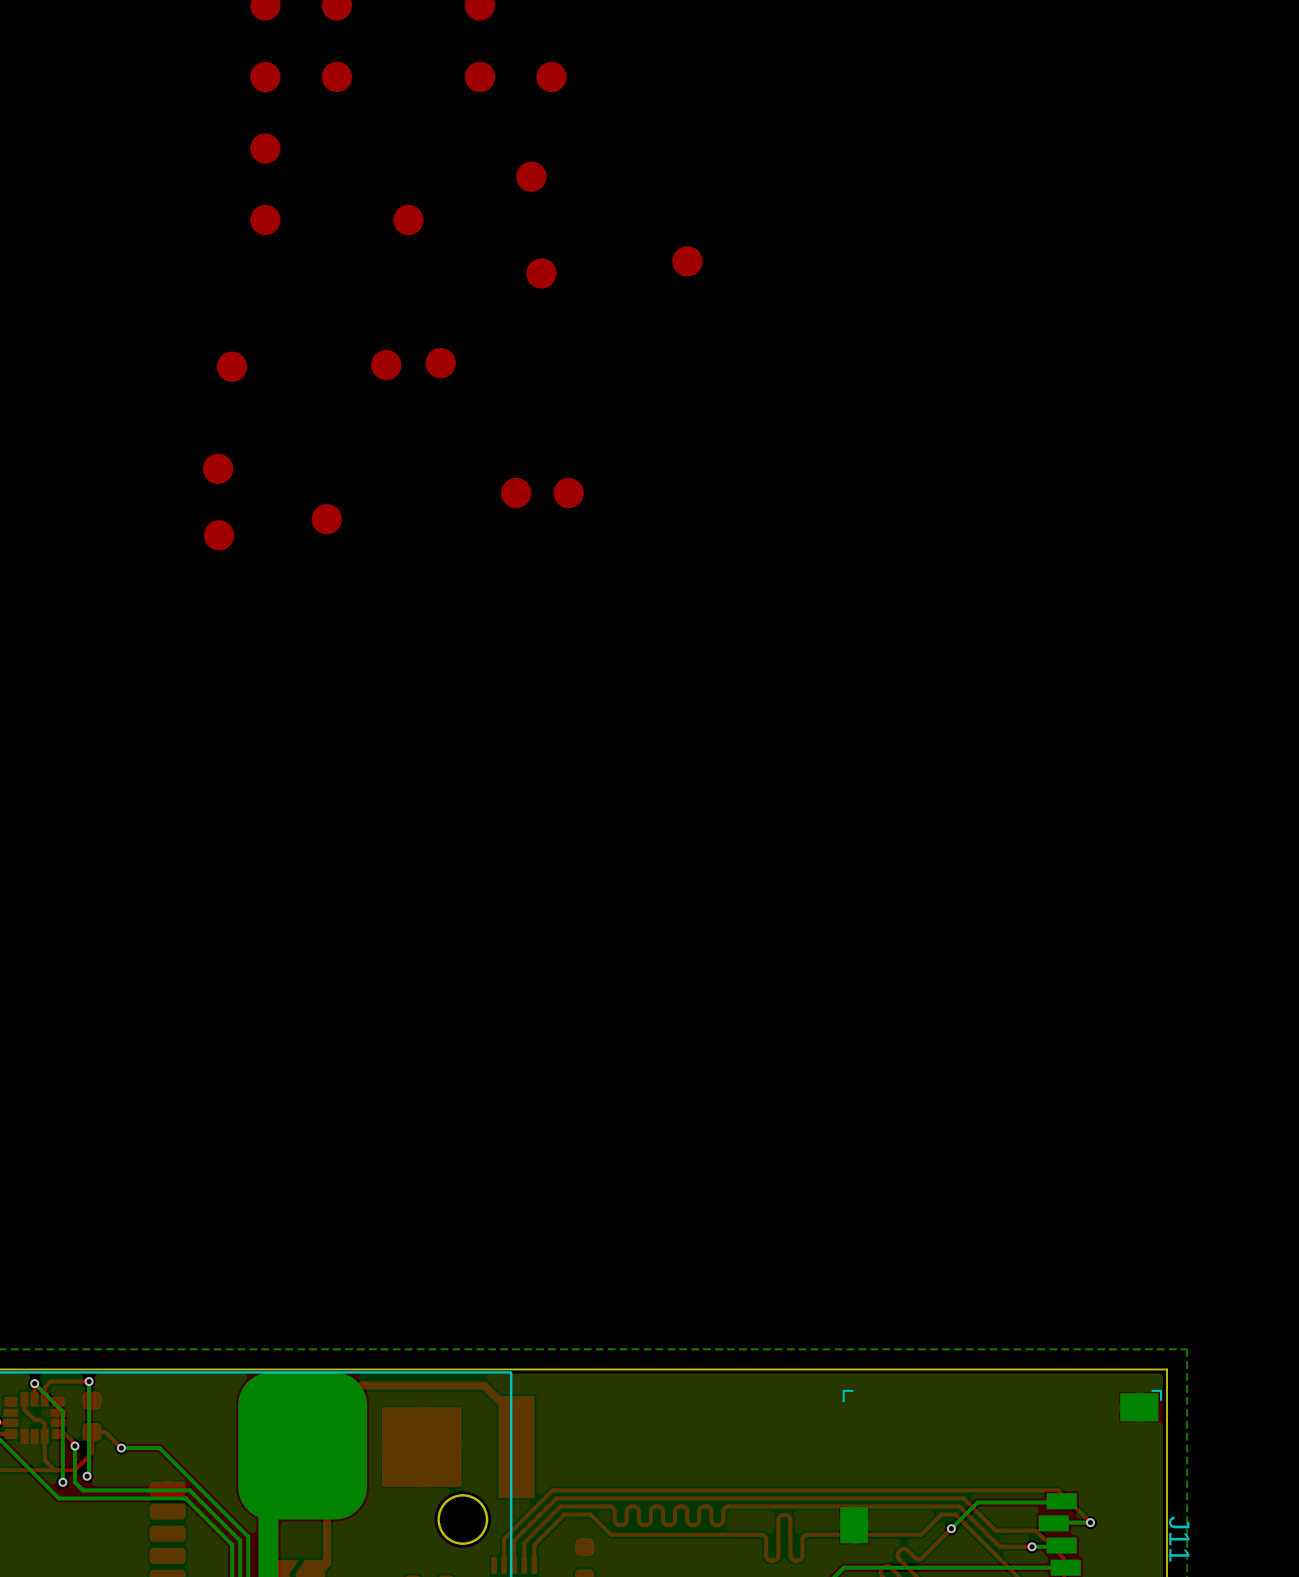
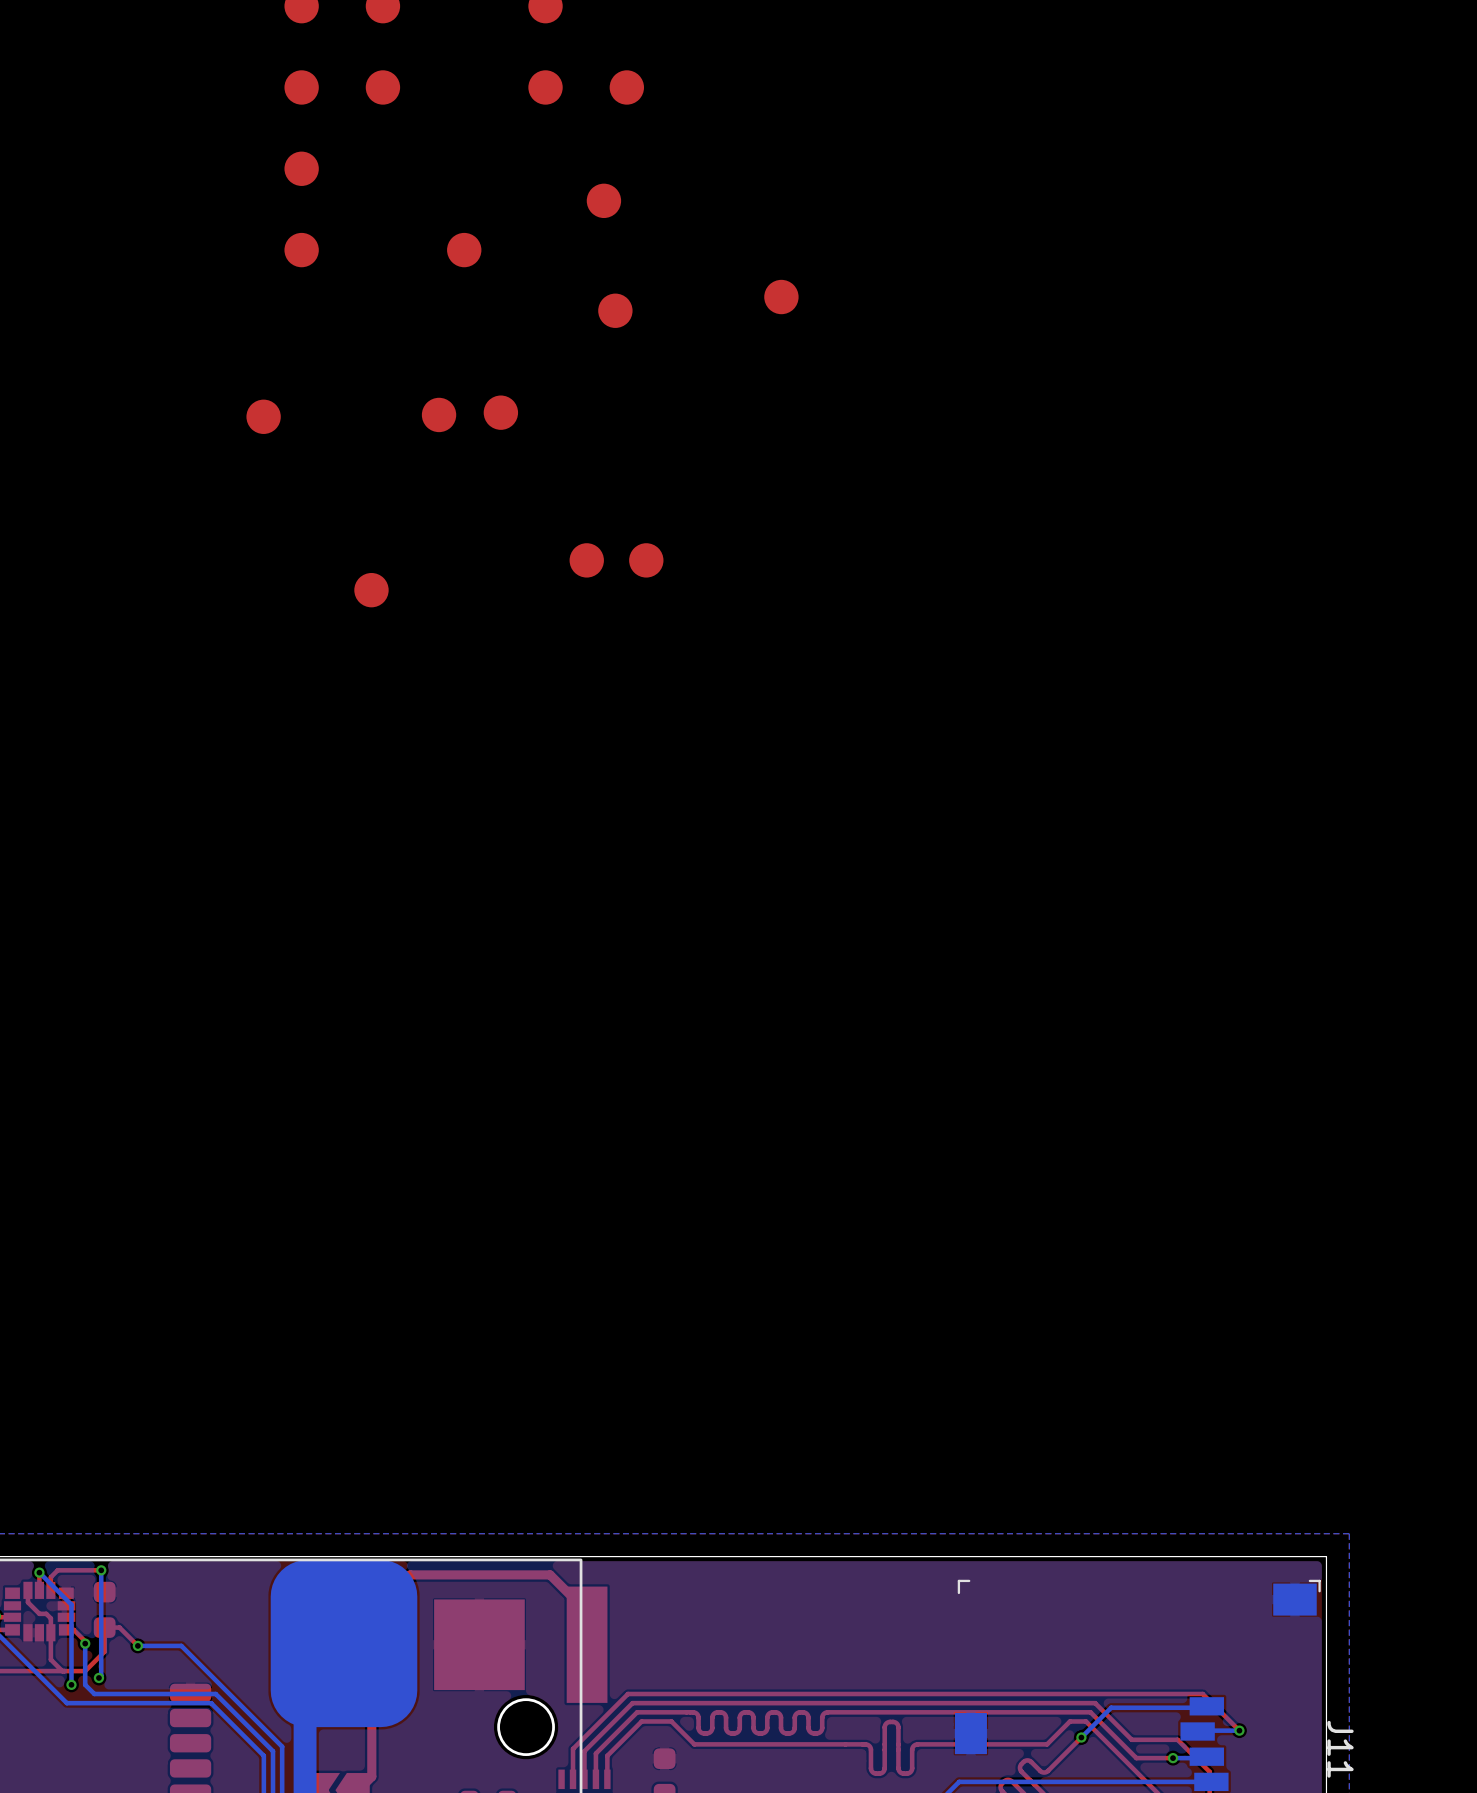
part: (218, 468) -> none
part: (219, 535) -> none

